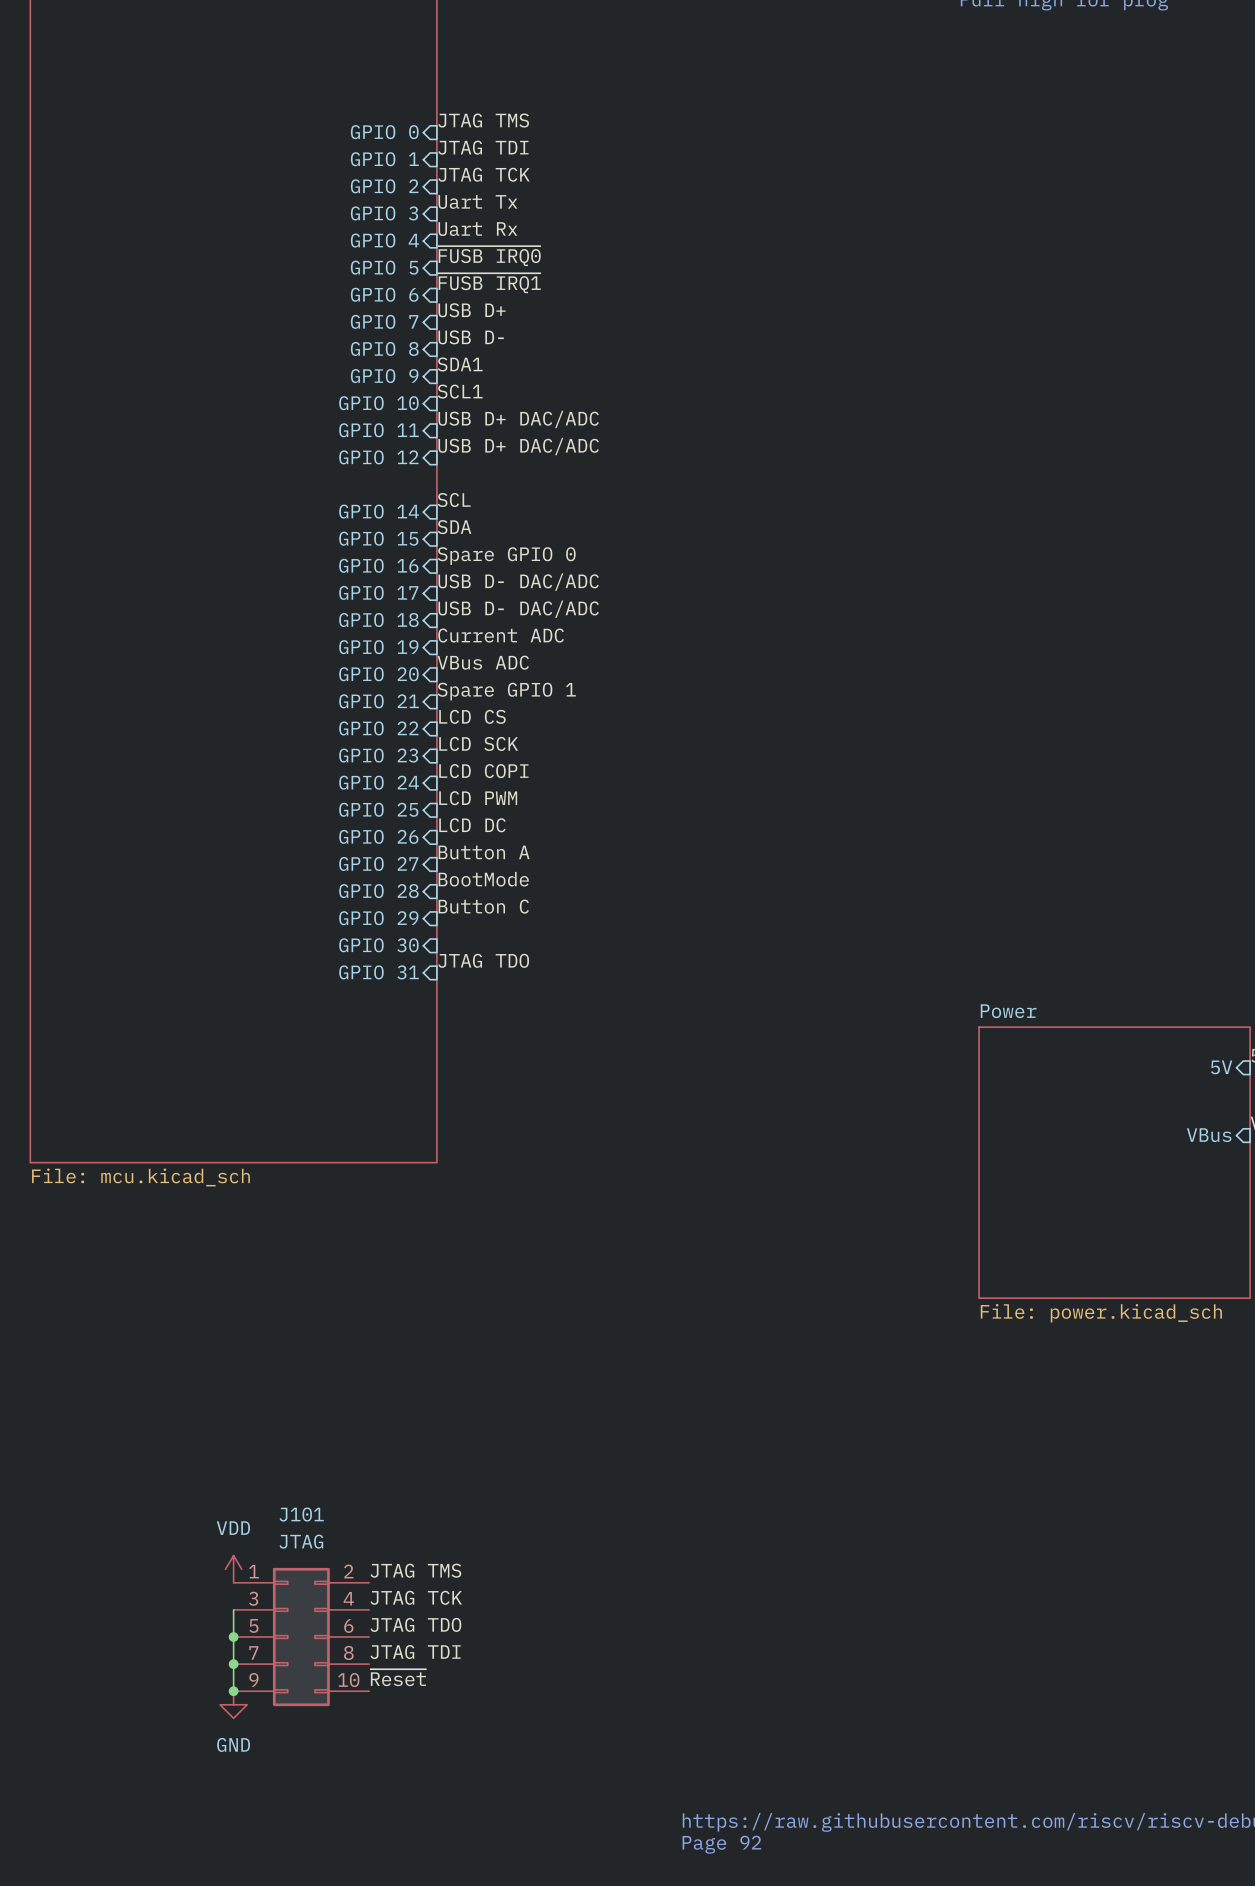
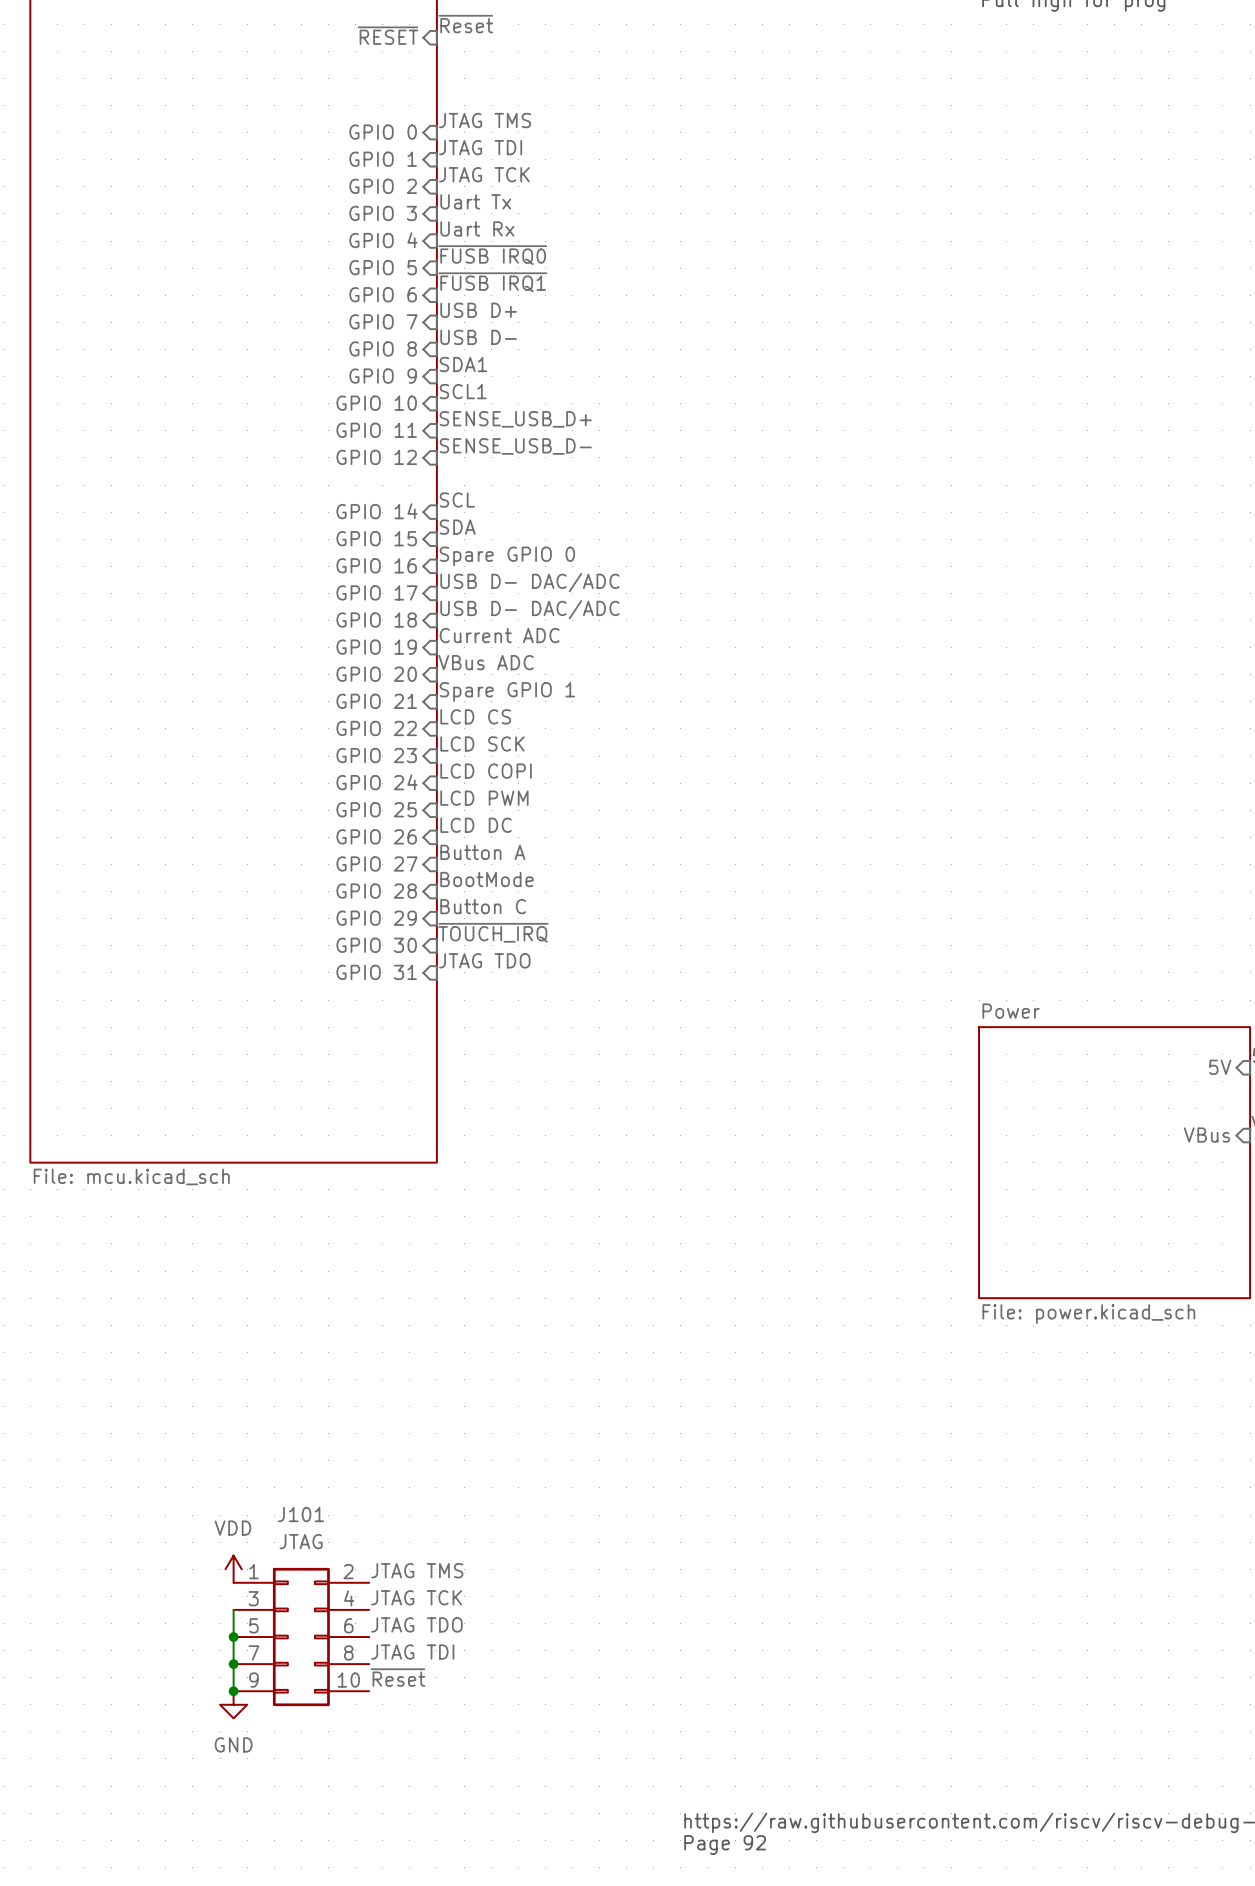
label: none -> ~{Reset} (465, 24)
sheet pin: none -> ~{RESET} (388, 35)
label: USB D+ DAC/ADC (518, 419) -> SENSE_USB_D+ (515, 419)
label: USB D+ DAC/ADC (518, 446) -> SENSE_USB_D- (515, 446)
label: none -> ~{TOUCH_IRQ} (493, 932)

